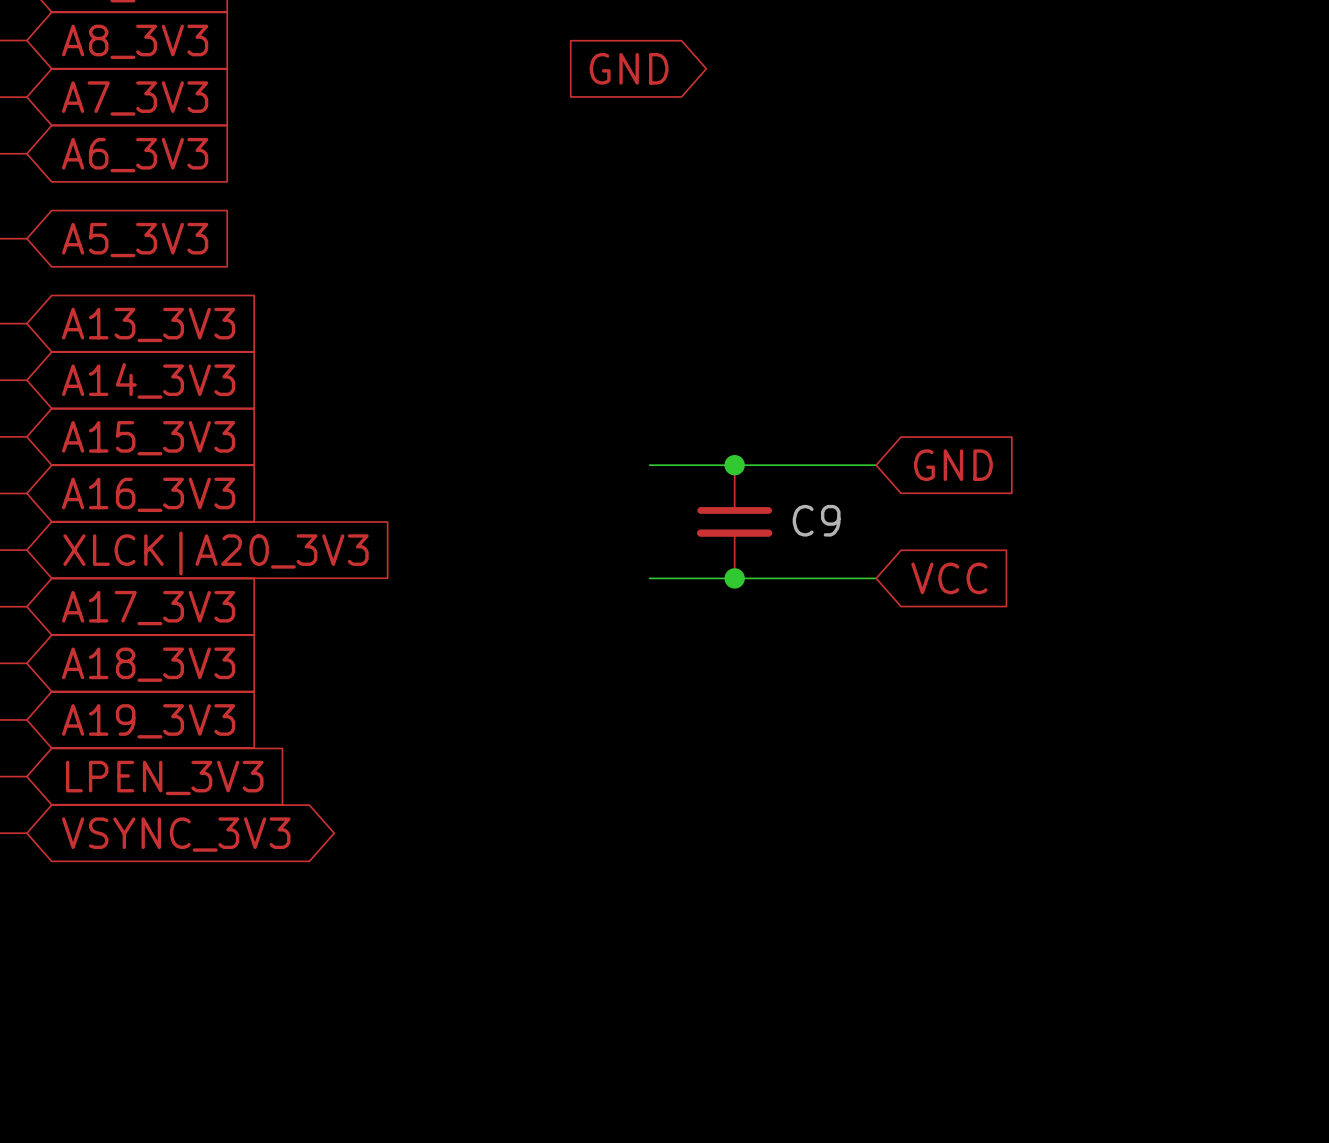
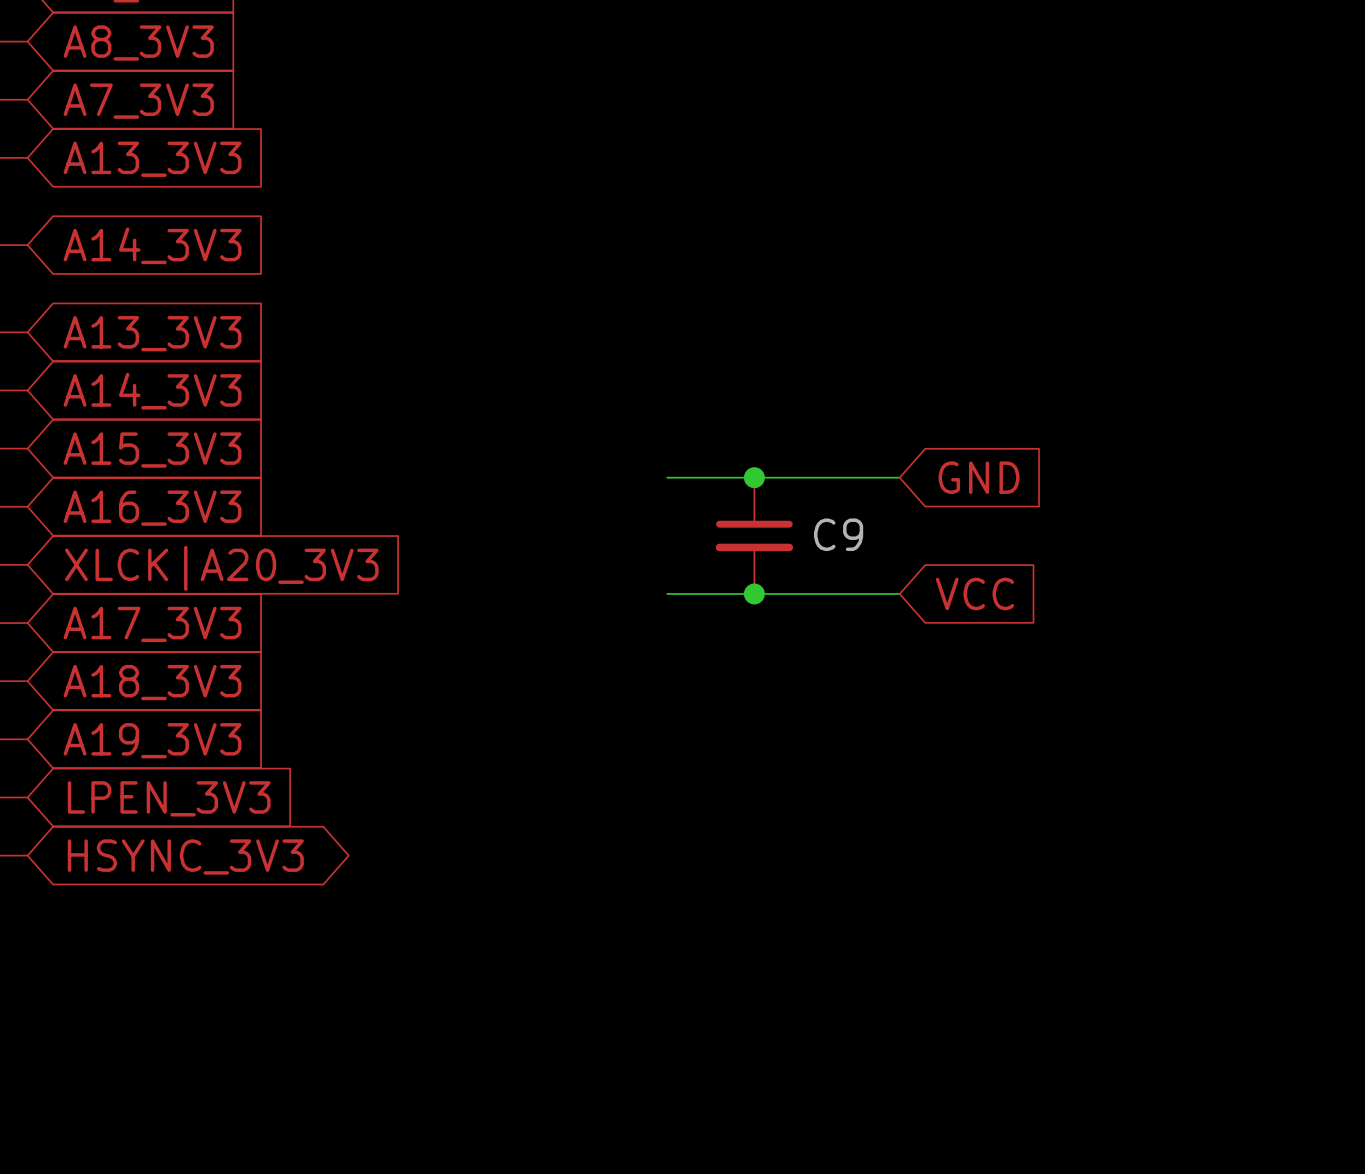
global label: GND (629, 68) -> none
global label: A6_3V3 (135, 155) -> A13_3V3 (152, 159)
global label: A5_3V3 (135, 240) -> A14_3V3 (152, 245)
global label: VSYNC_3V3 (176, 834) -> HSYNC_3V3 (185, 857)

